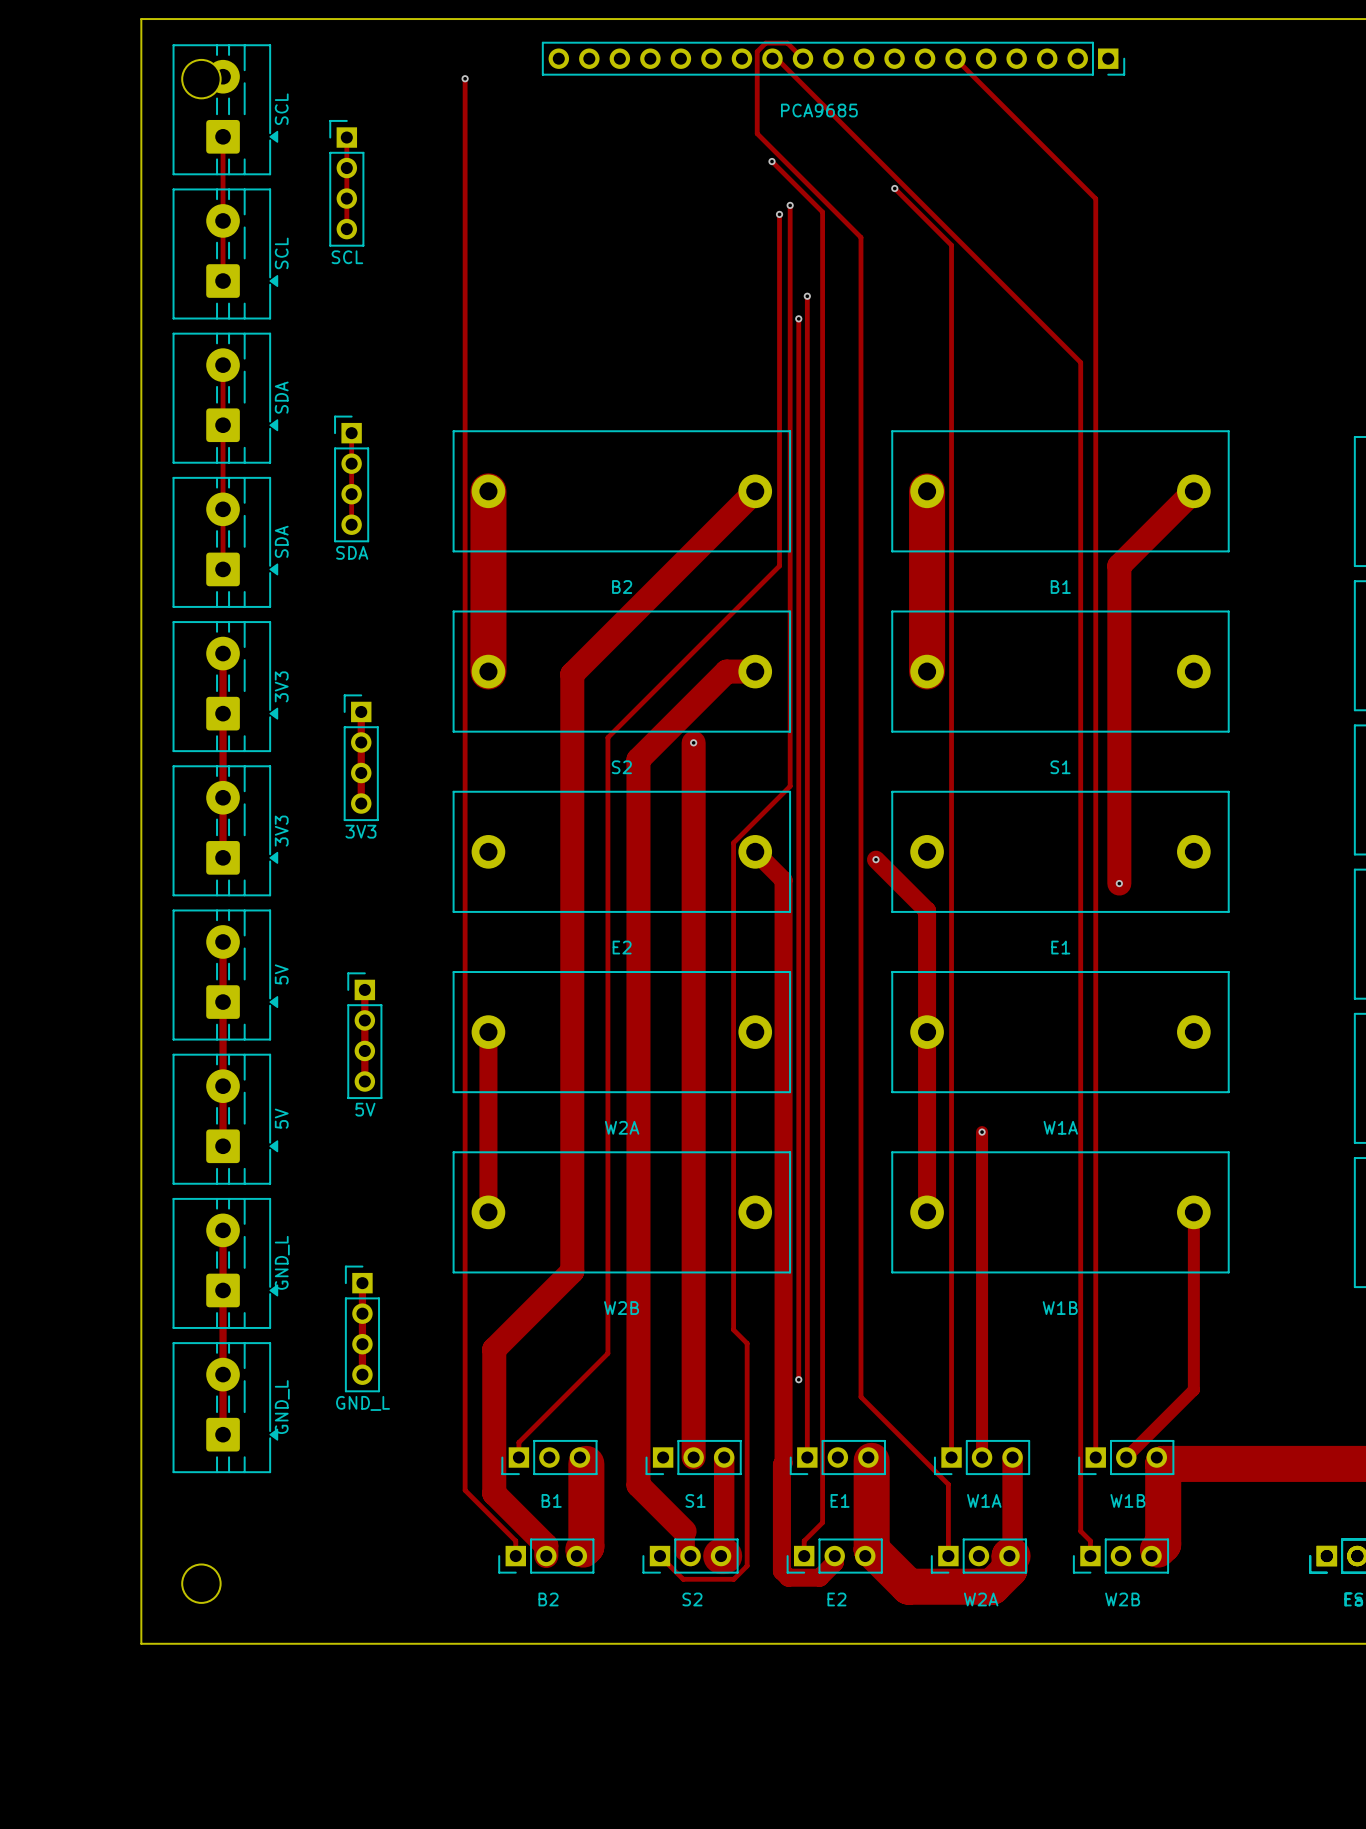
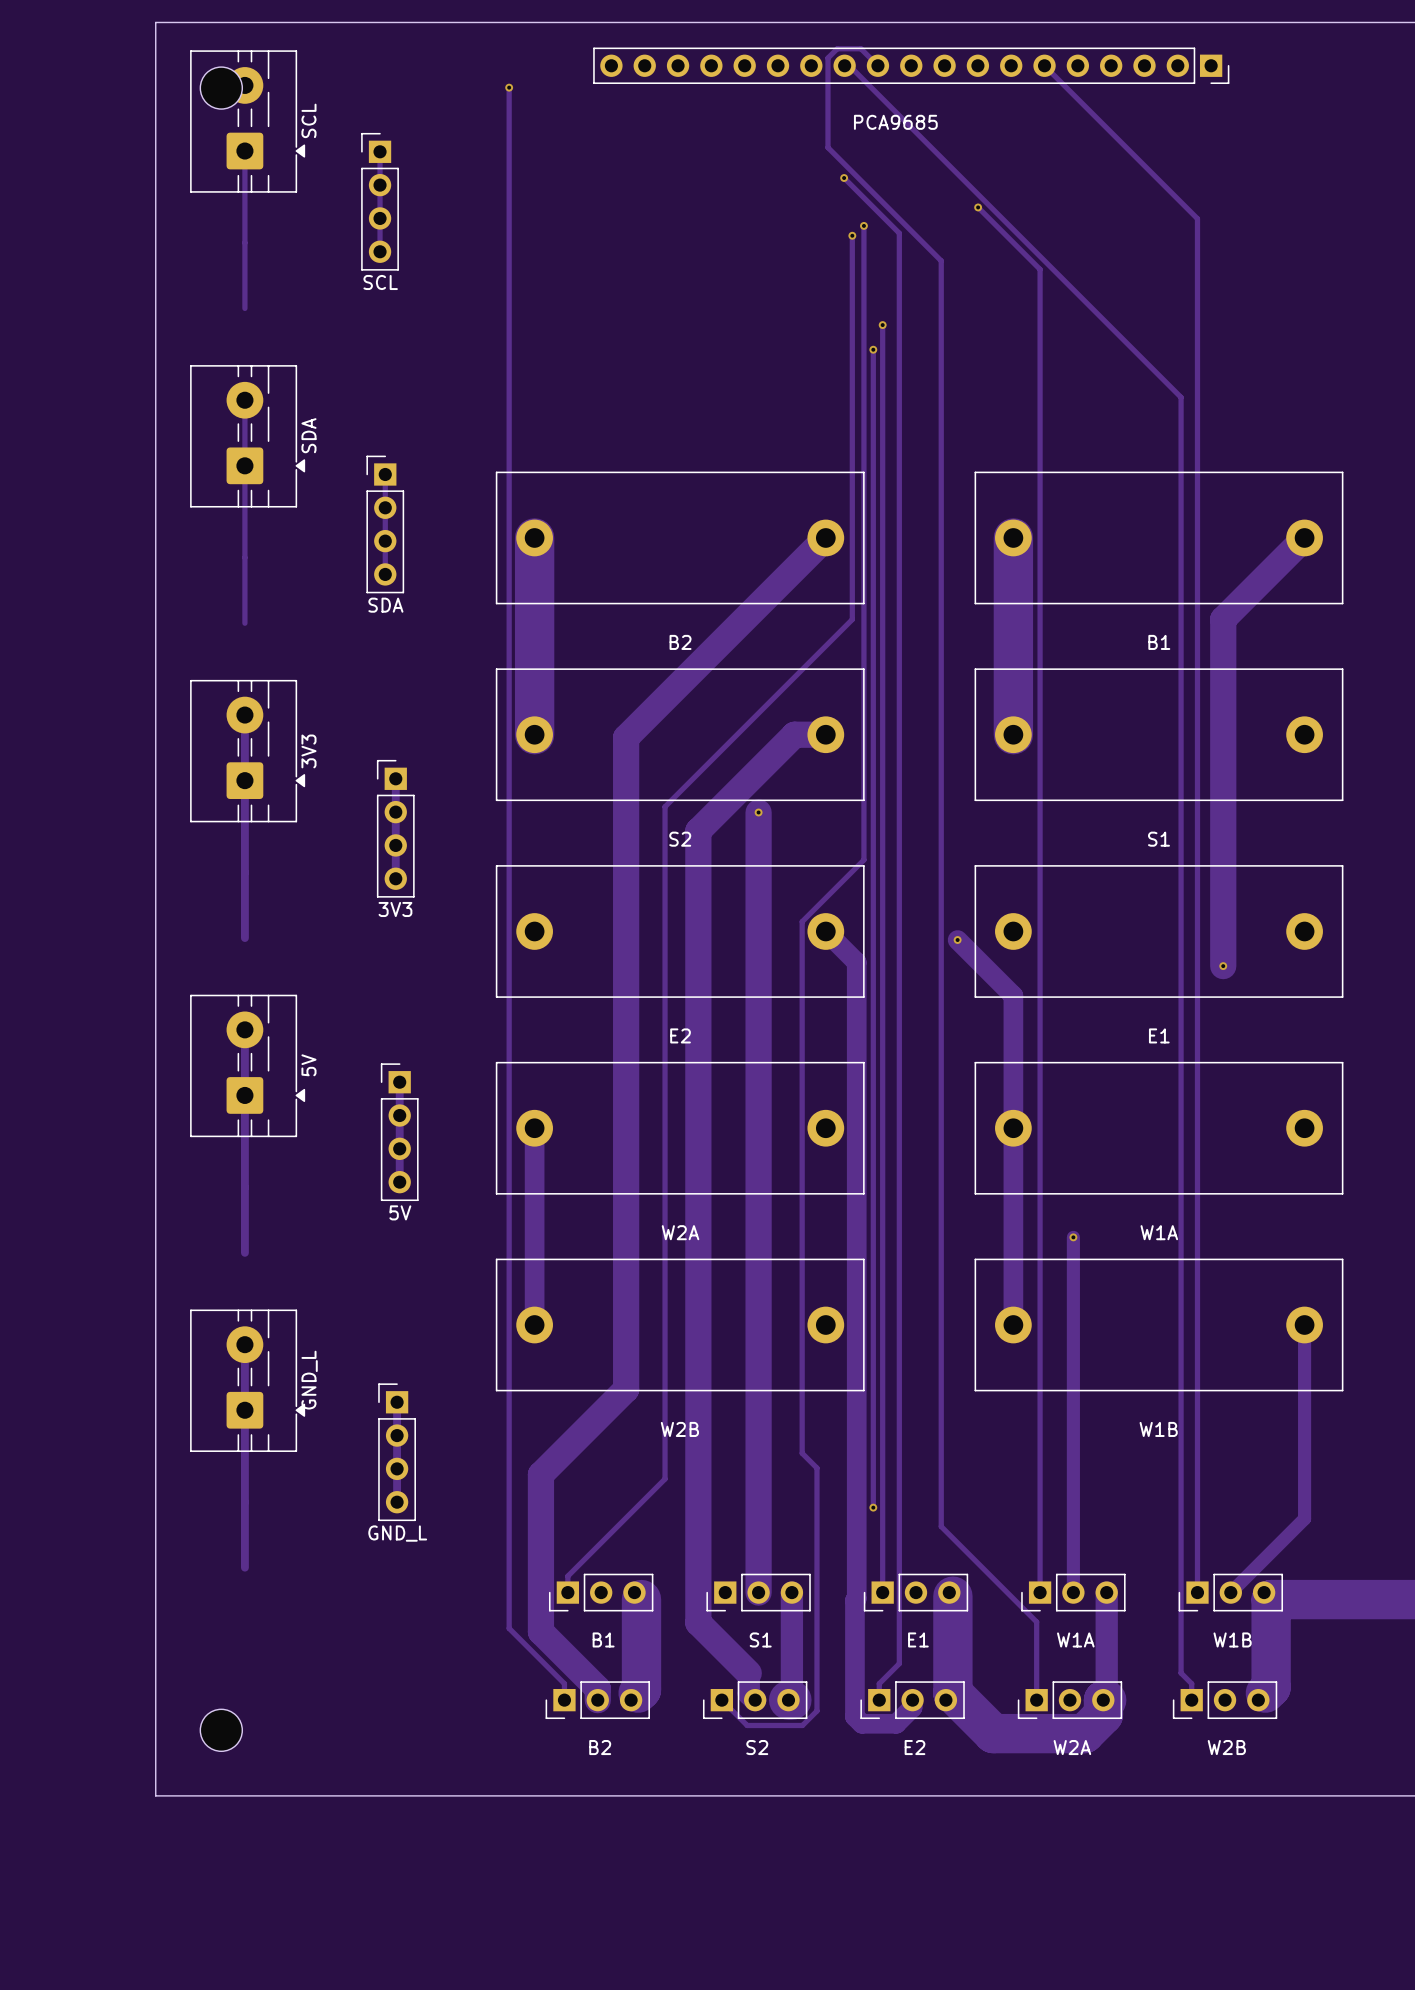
part: SCL (225, 253) -> none
part: SDA (225, 542) -> none
part: 3V3 (225, 830) -> none
part: 5V (225, 1119) -> none
part: GND_L (225, 1407) -> none

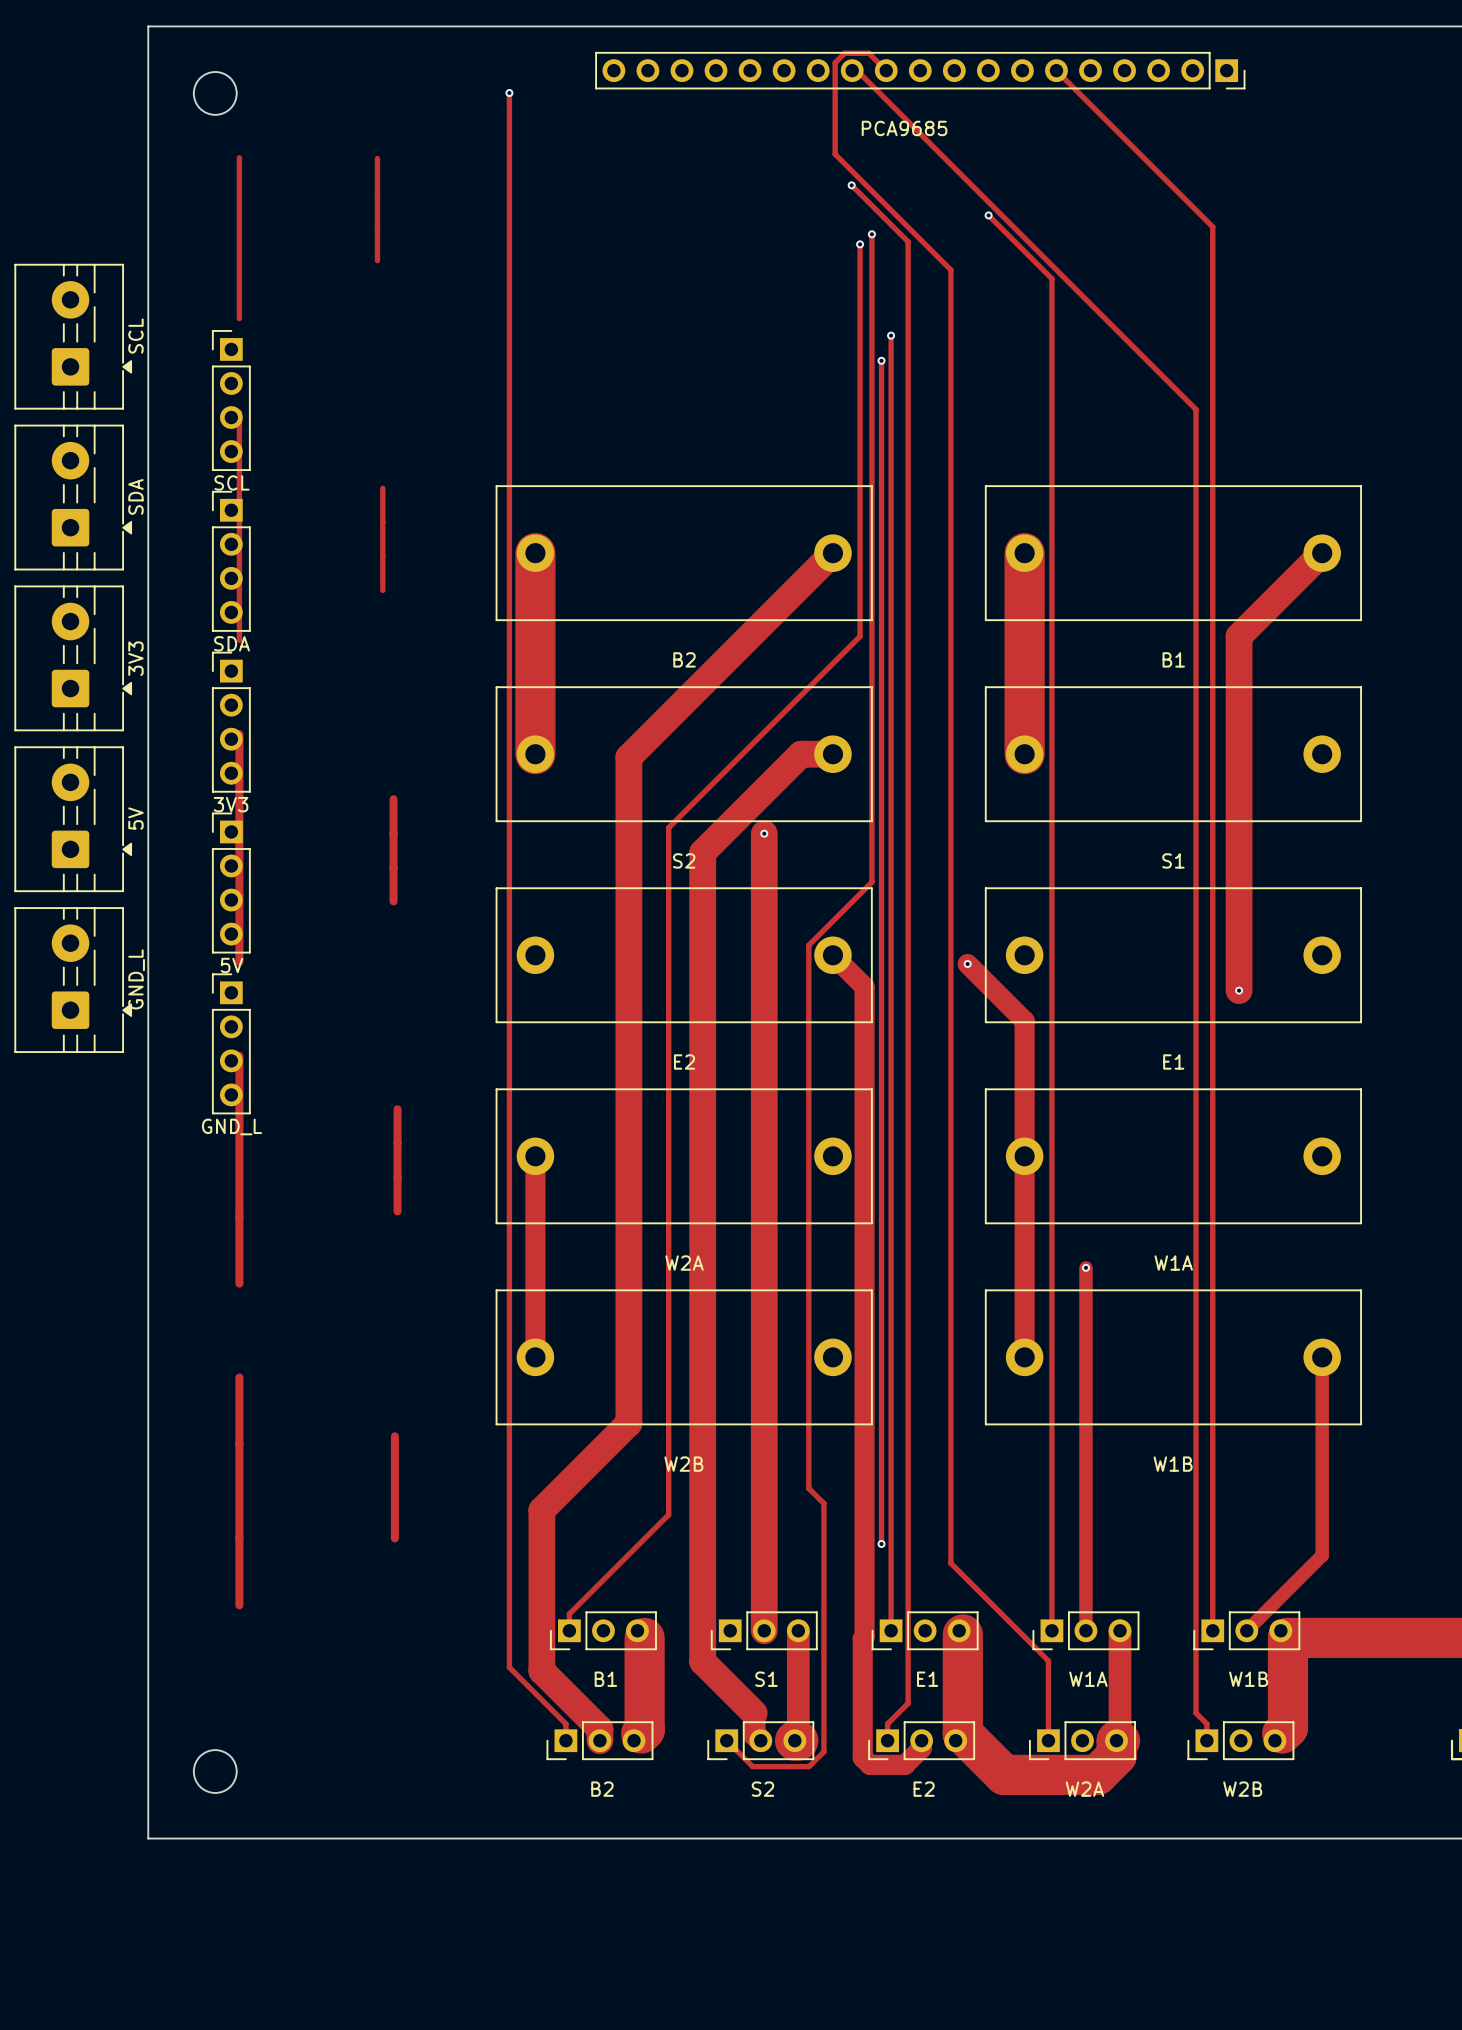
part position: (247, 121) -> (73, 336)
part position: (380, 201) -> (231, 400)
part position: (247, 436) -> (73, 497)
part position: (385, 524) -> (231, 561)
part position: (247, 751) -> (73, 658)
part position: (395, 828) -> (231, 722)
part: none -> GND_L (73, 980)
part: none -> GND_L (231, 1043)
part position: (247, 1065) -> (73, 819)
part position: (399, 1132) -> (231, 883)
part: GND_L (247, 1380) -> none
part: GND_L (397, 1452) -> none

